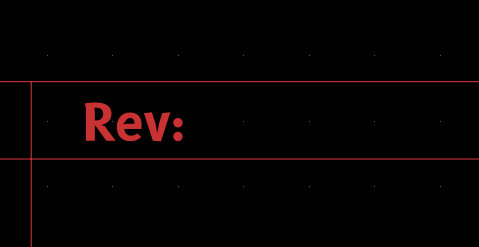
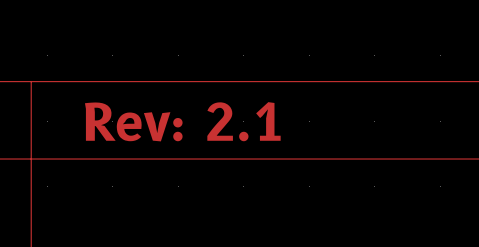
title block: Rev: (133, 121) -> Rev: 2.1 (182, 121)

